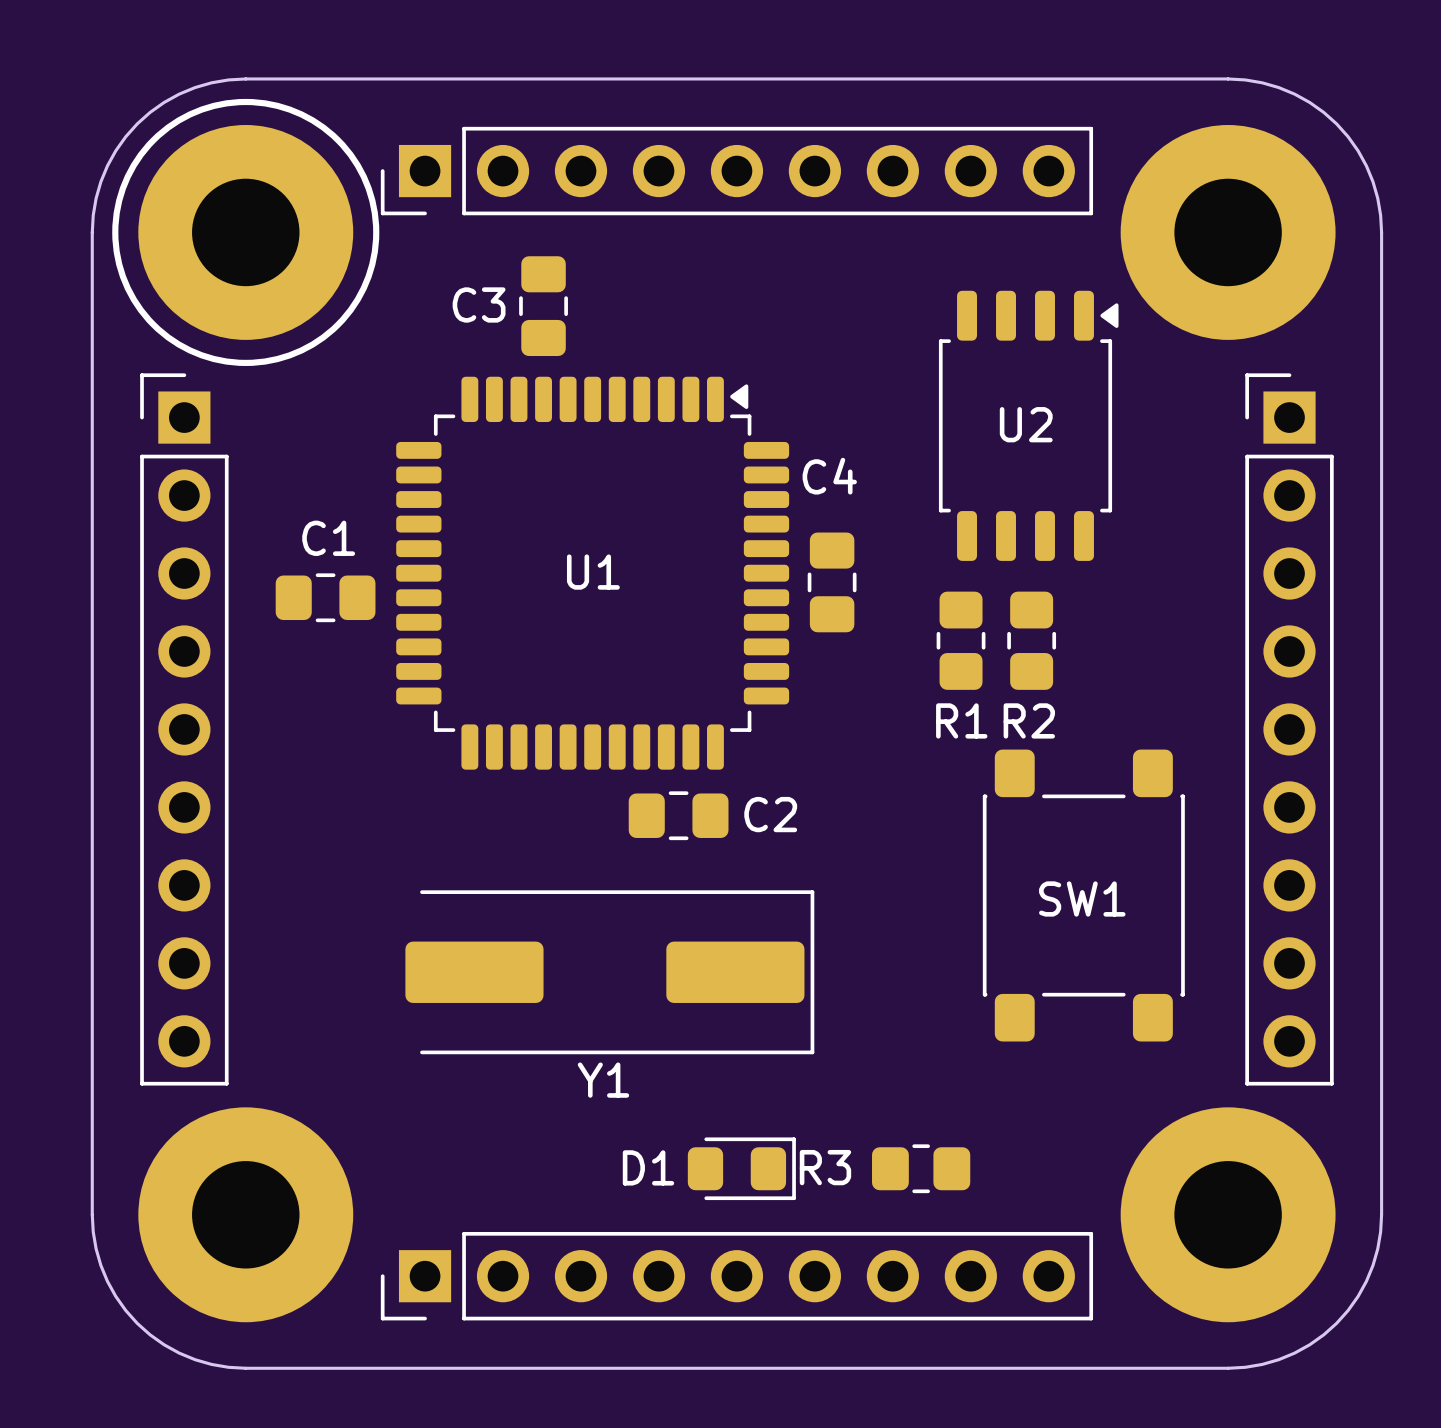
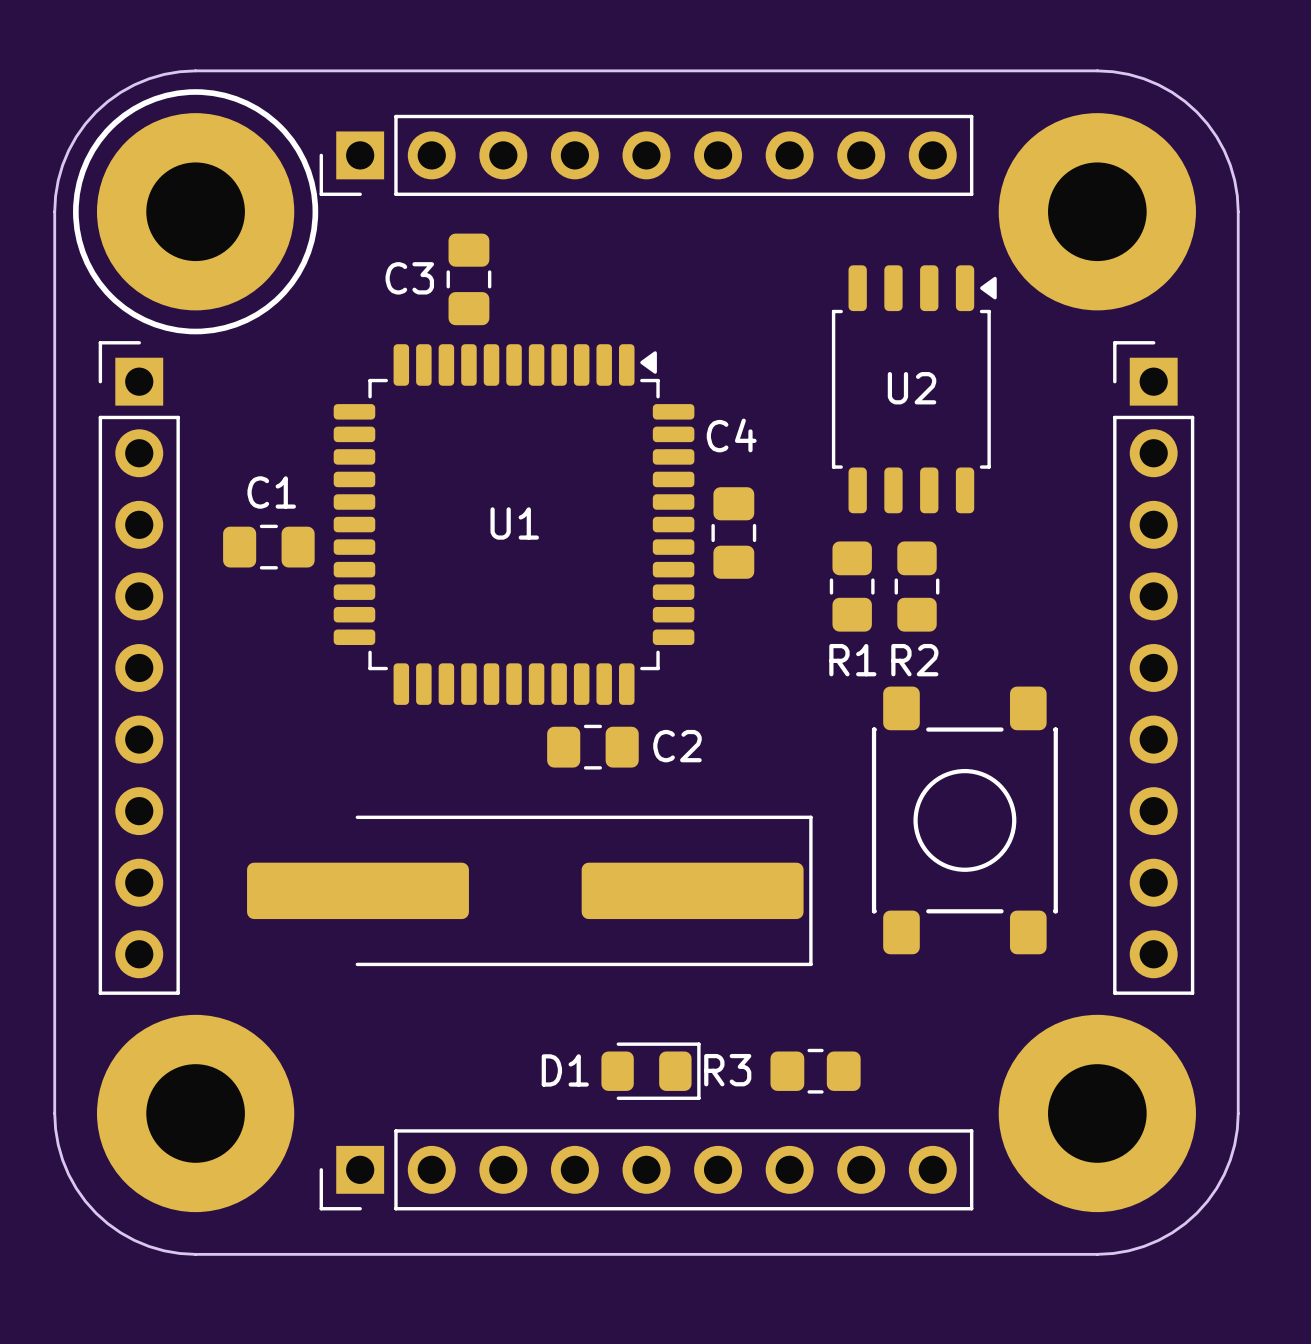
SW1: (1083, 895) -> none
part: none -> (964, 820)
Y1: (609, 972) -> none
part: none -> (529, 890)

